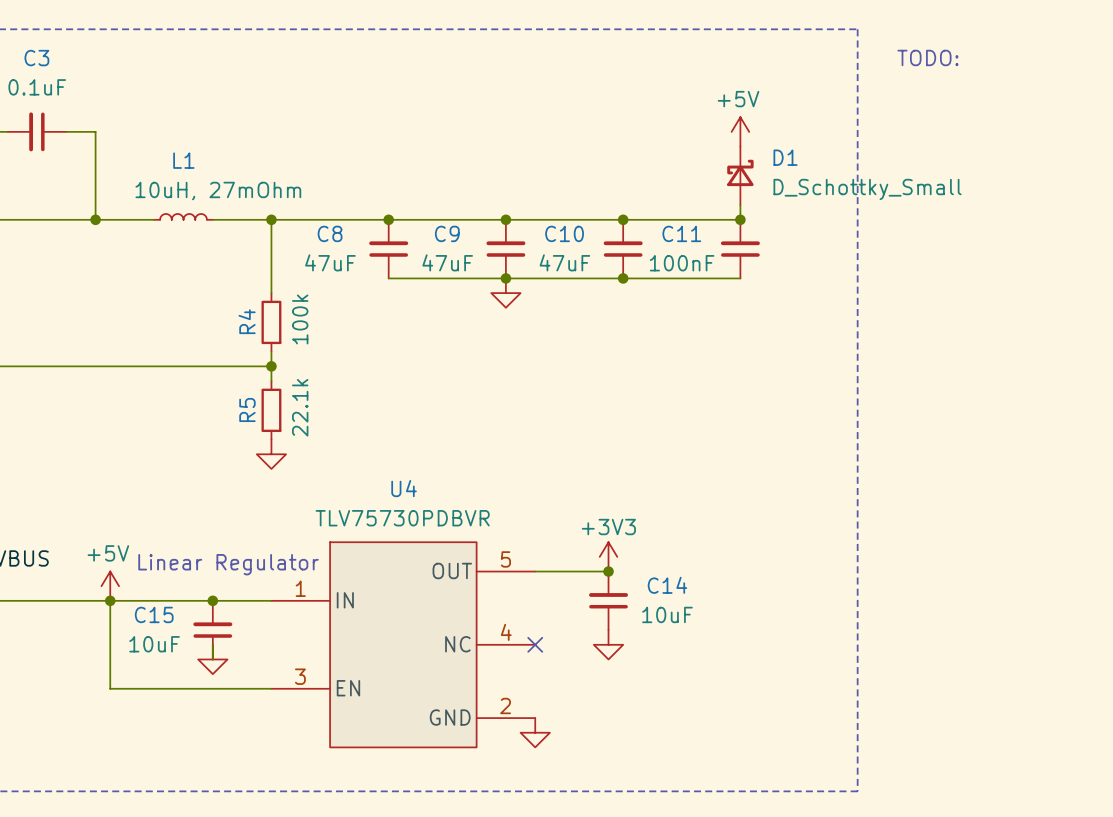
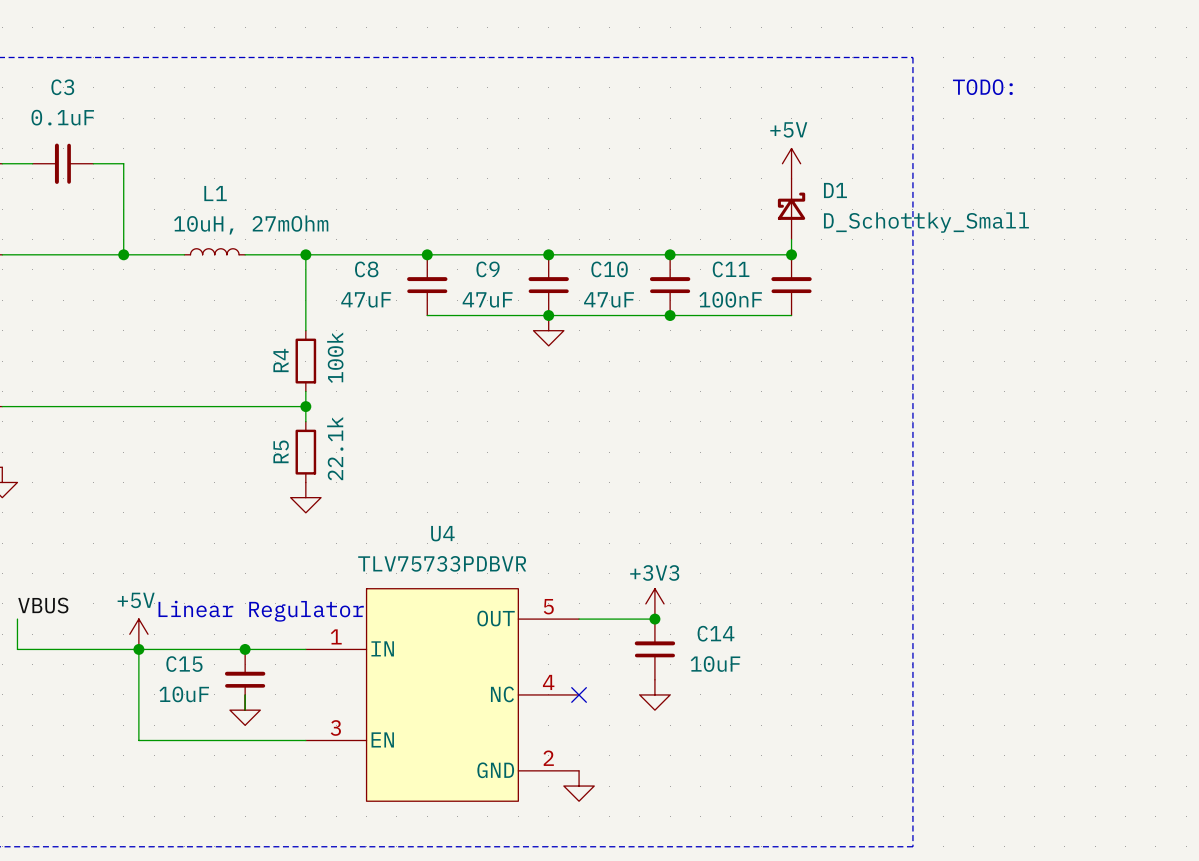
U4 value: TLV75730PDBVR (402, 518) -> TLV75733PDBVR (442, 563)

